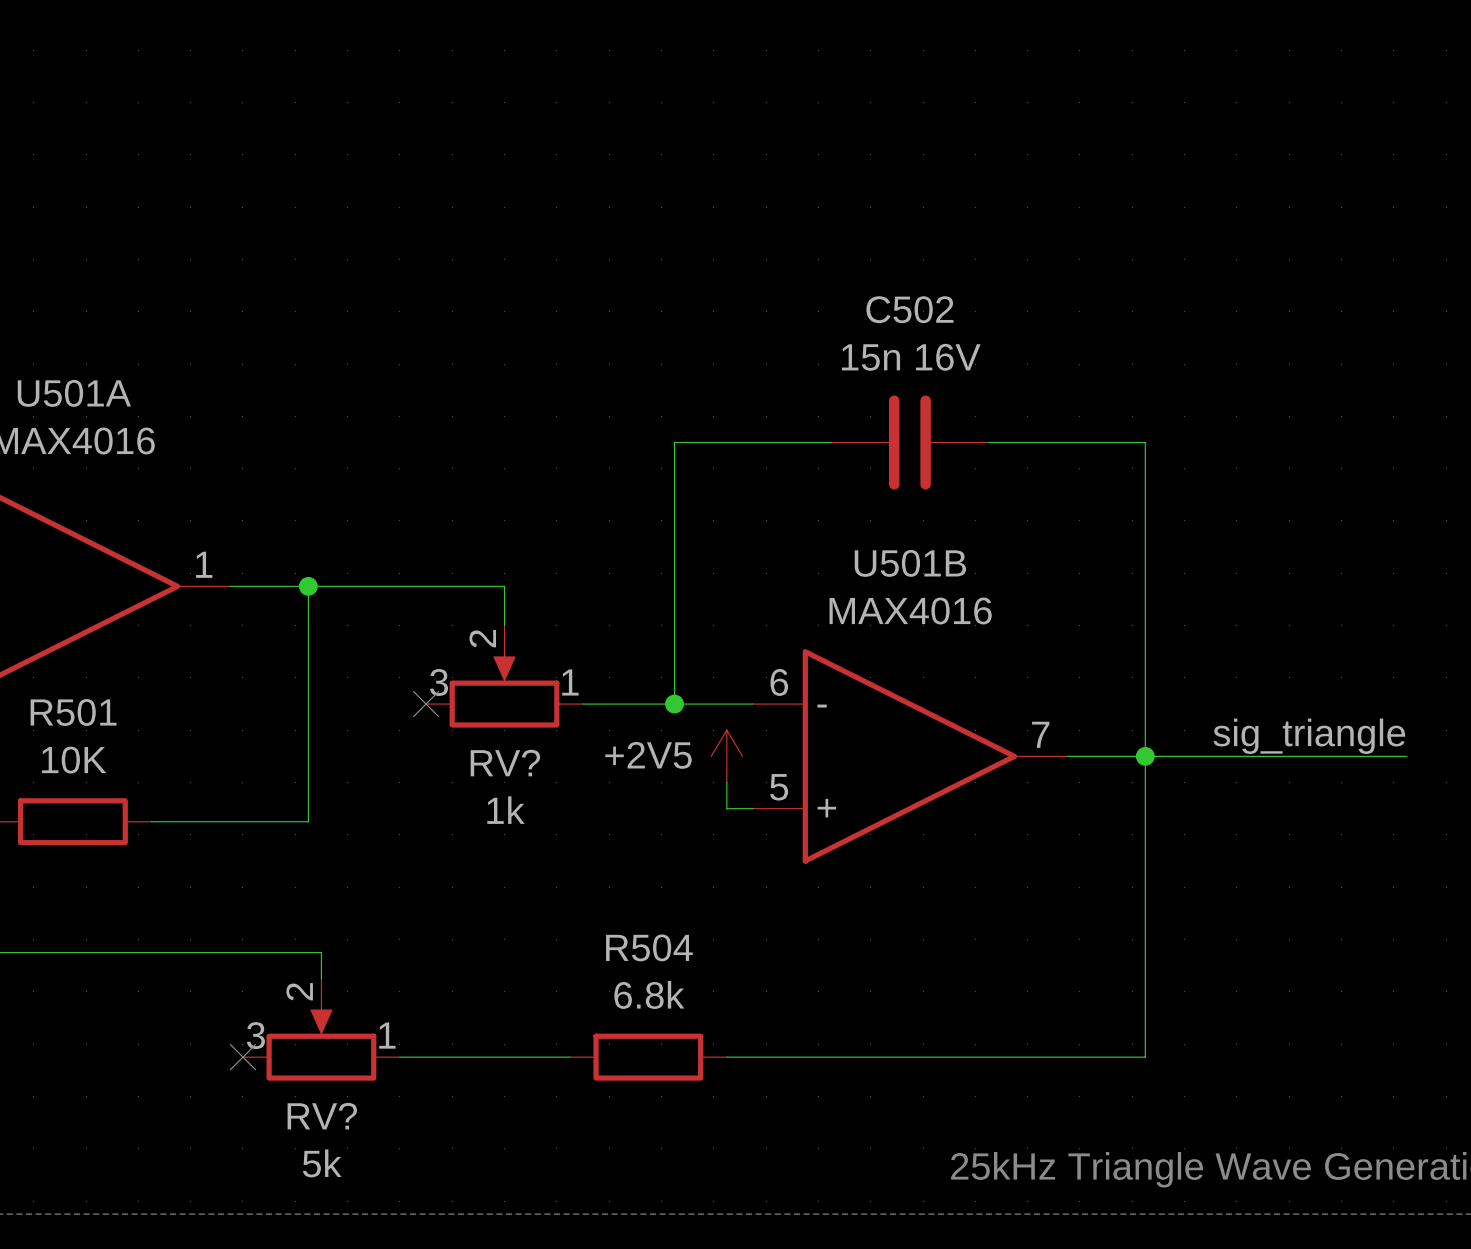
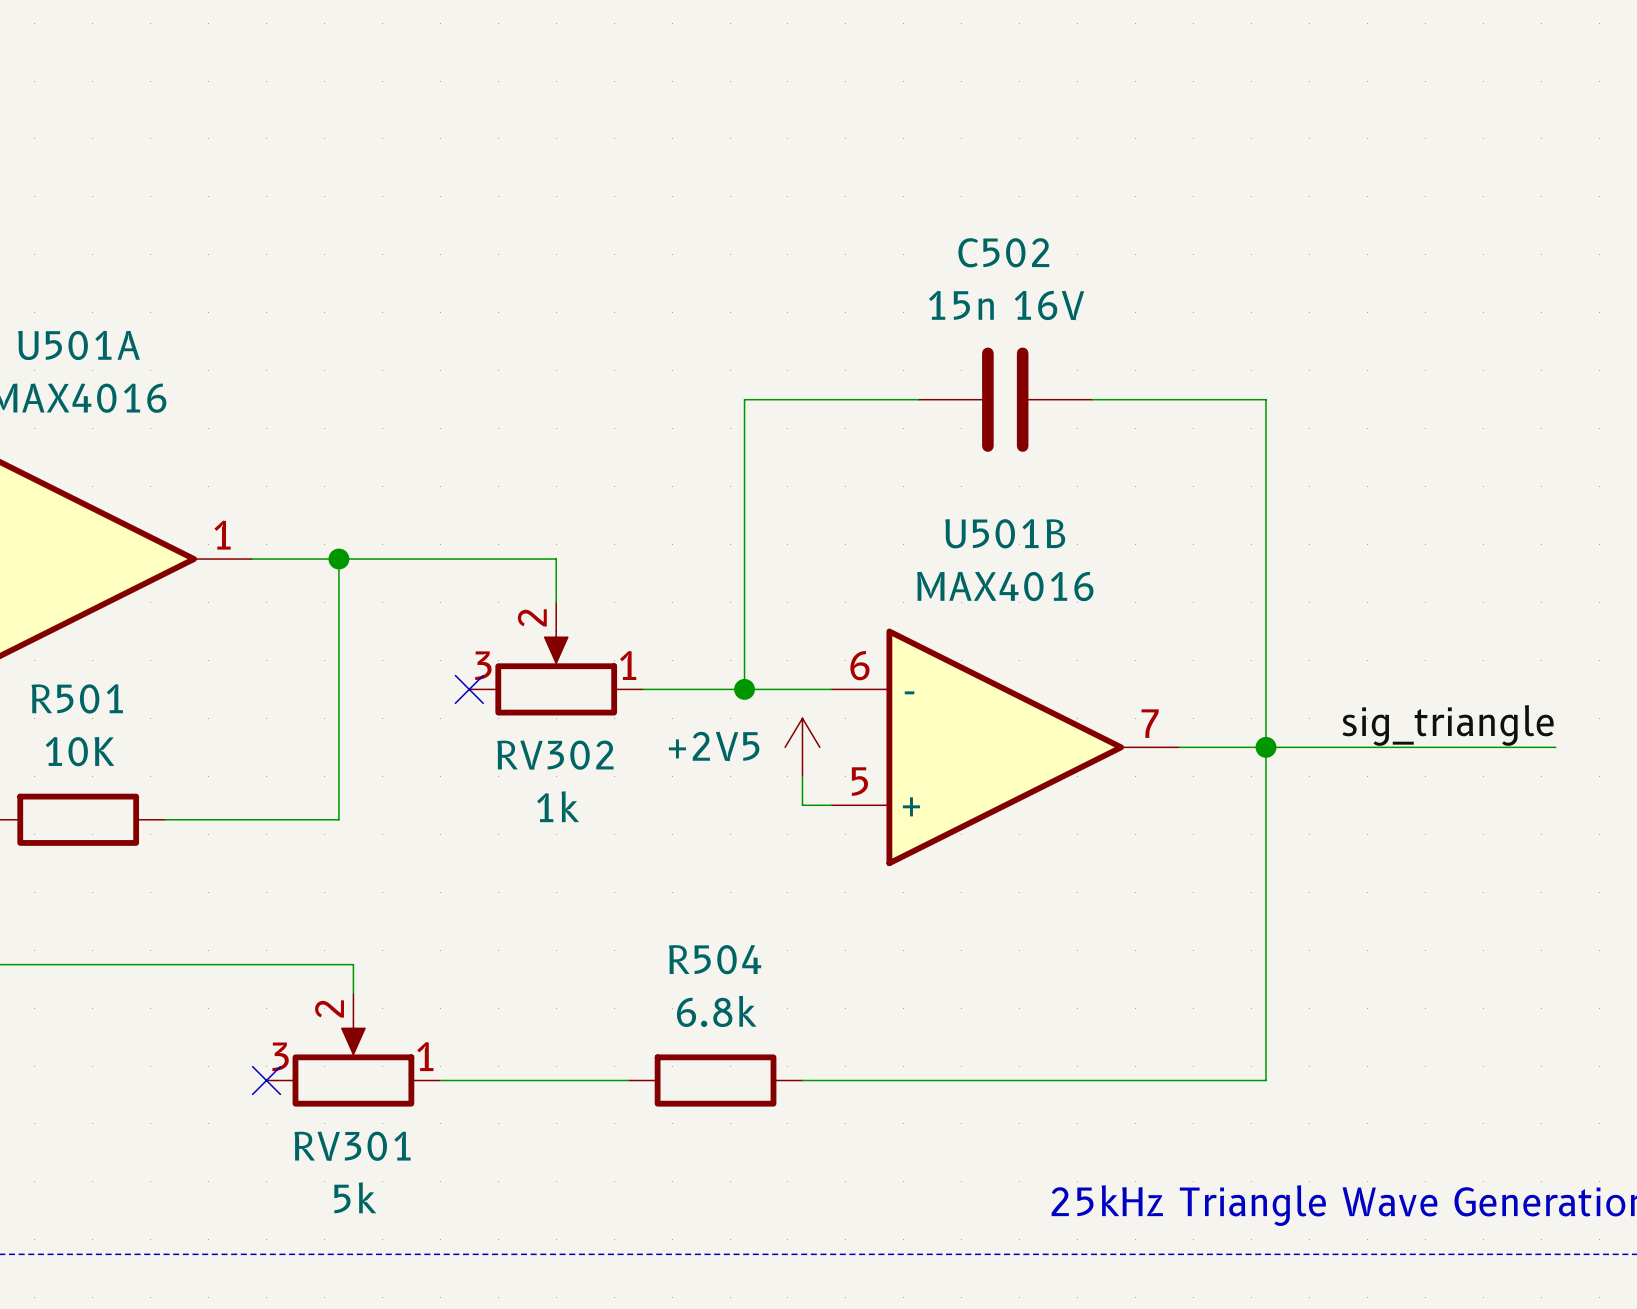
RV? name: RV? (505, 763) -> RV302 (555, 755)
RV? name: RV? (322, 1116) -> RV301 (352, 1146)

